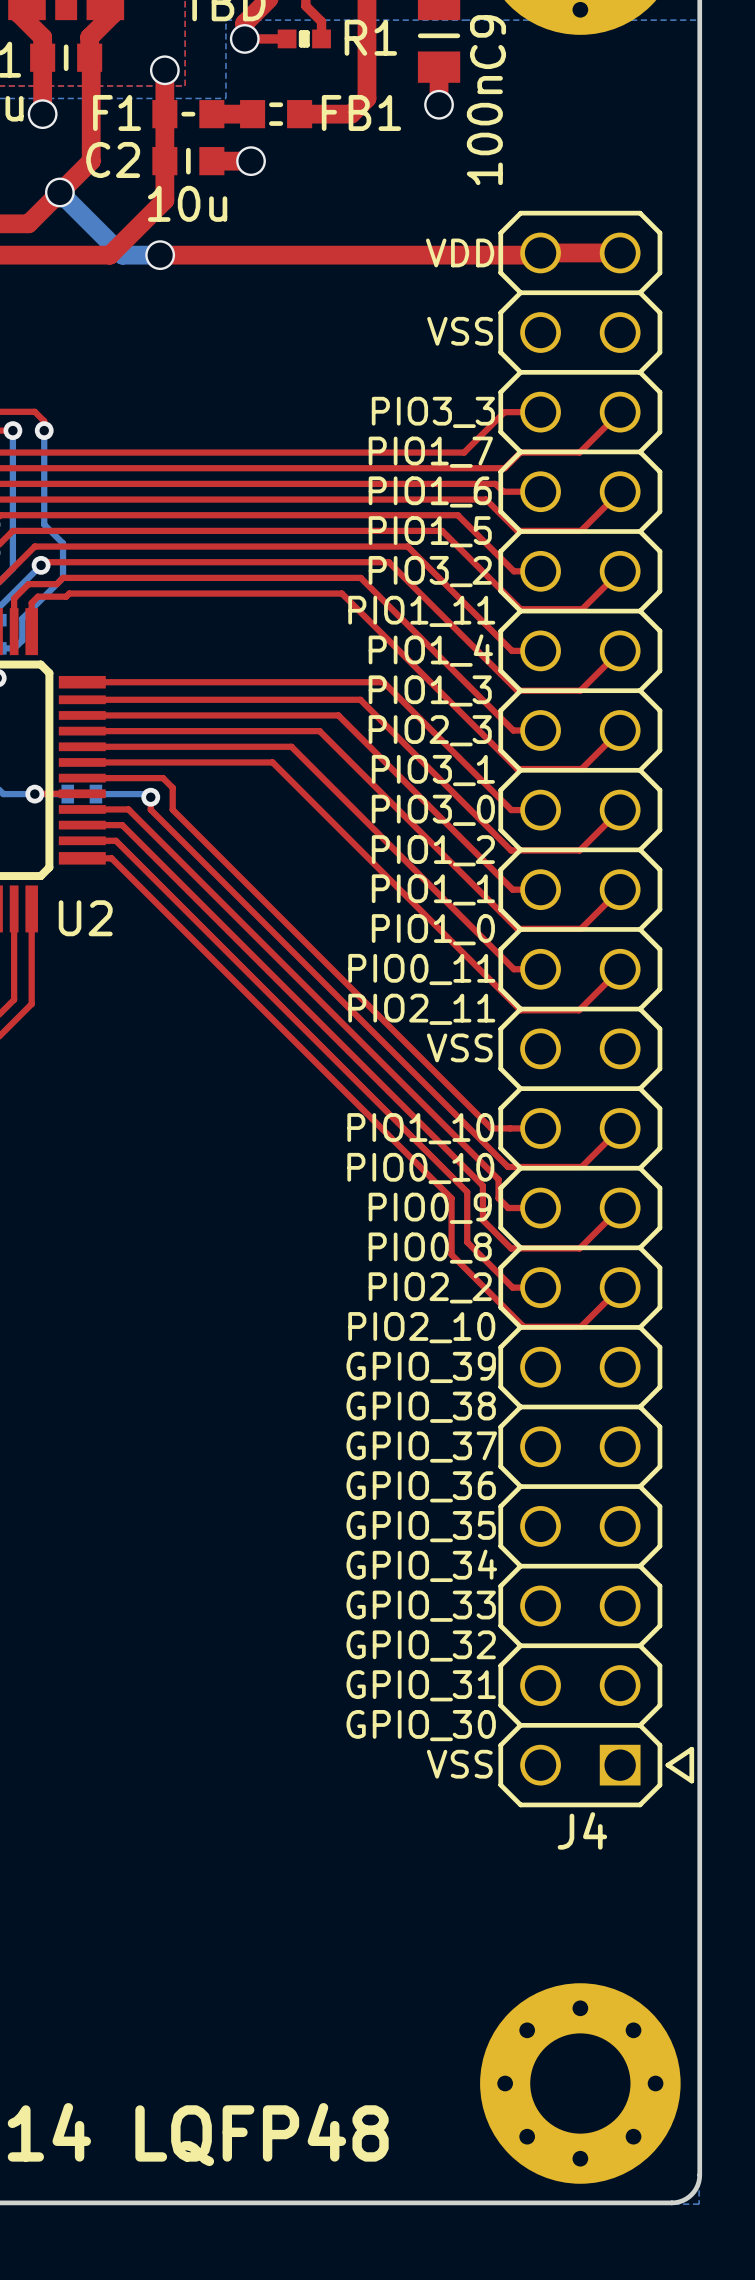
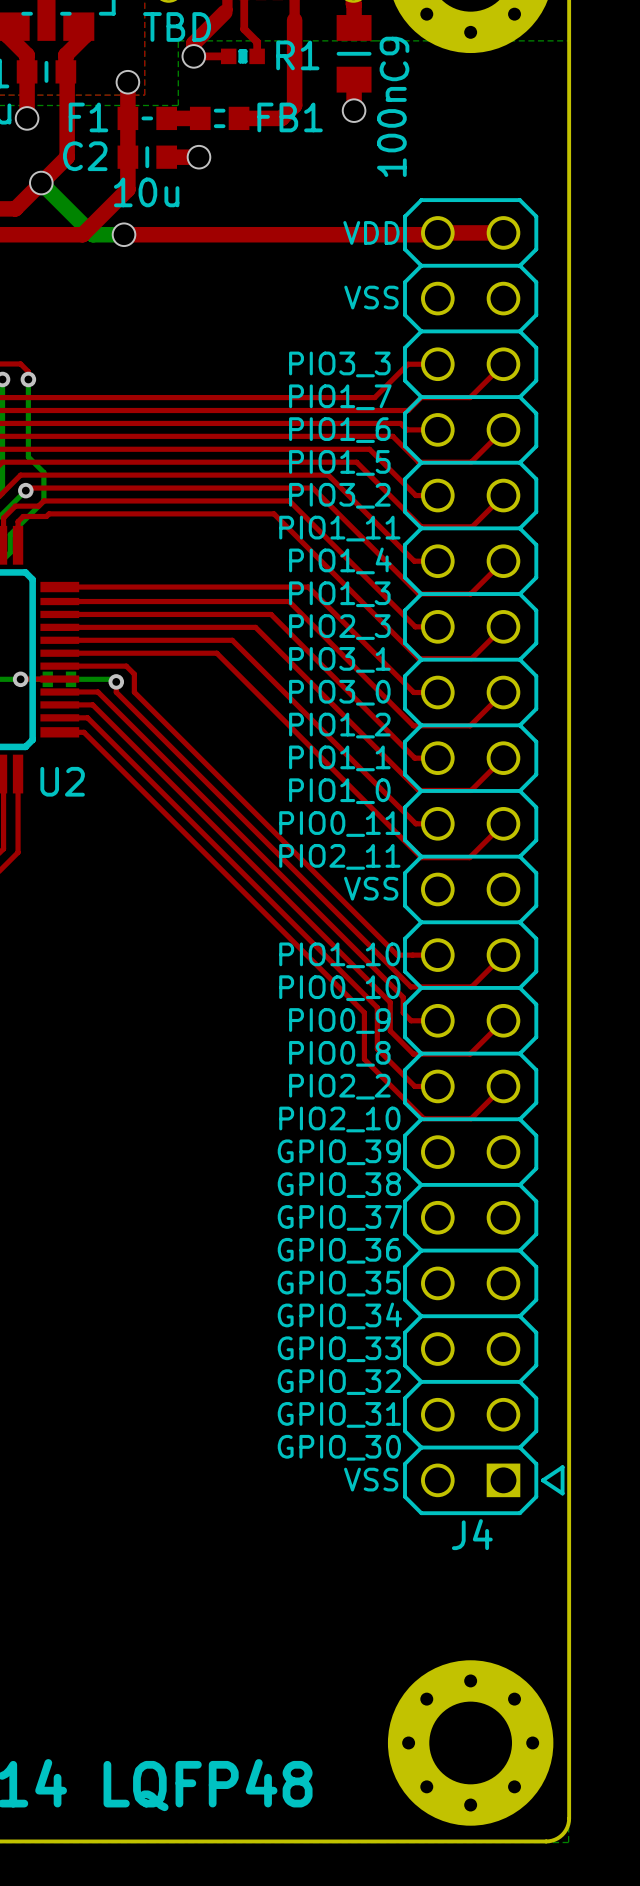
J4 footprint: [498, 210, 695, 1808] -> [403, 198, 565, 1516]

